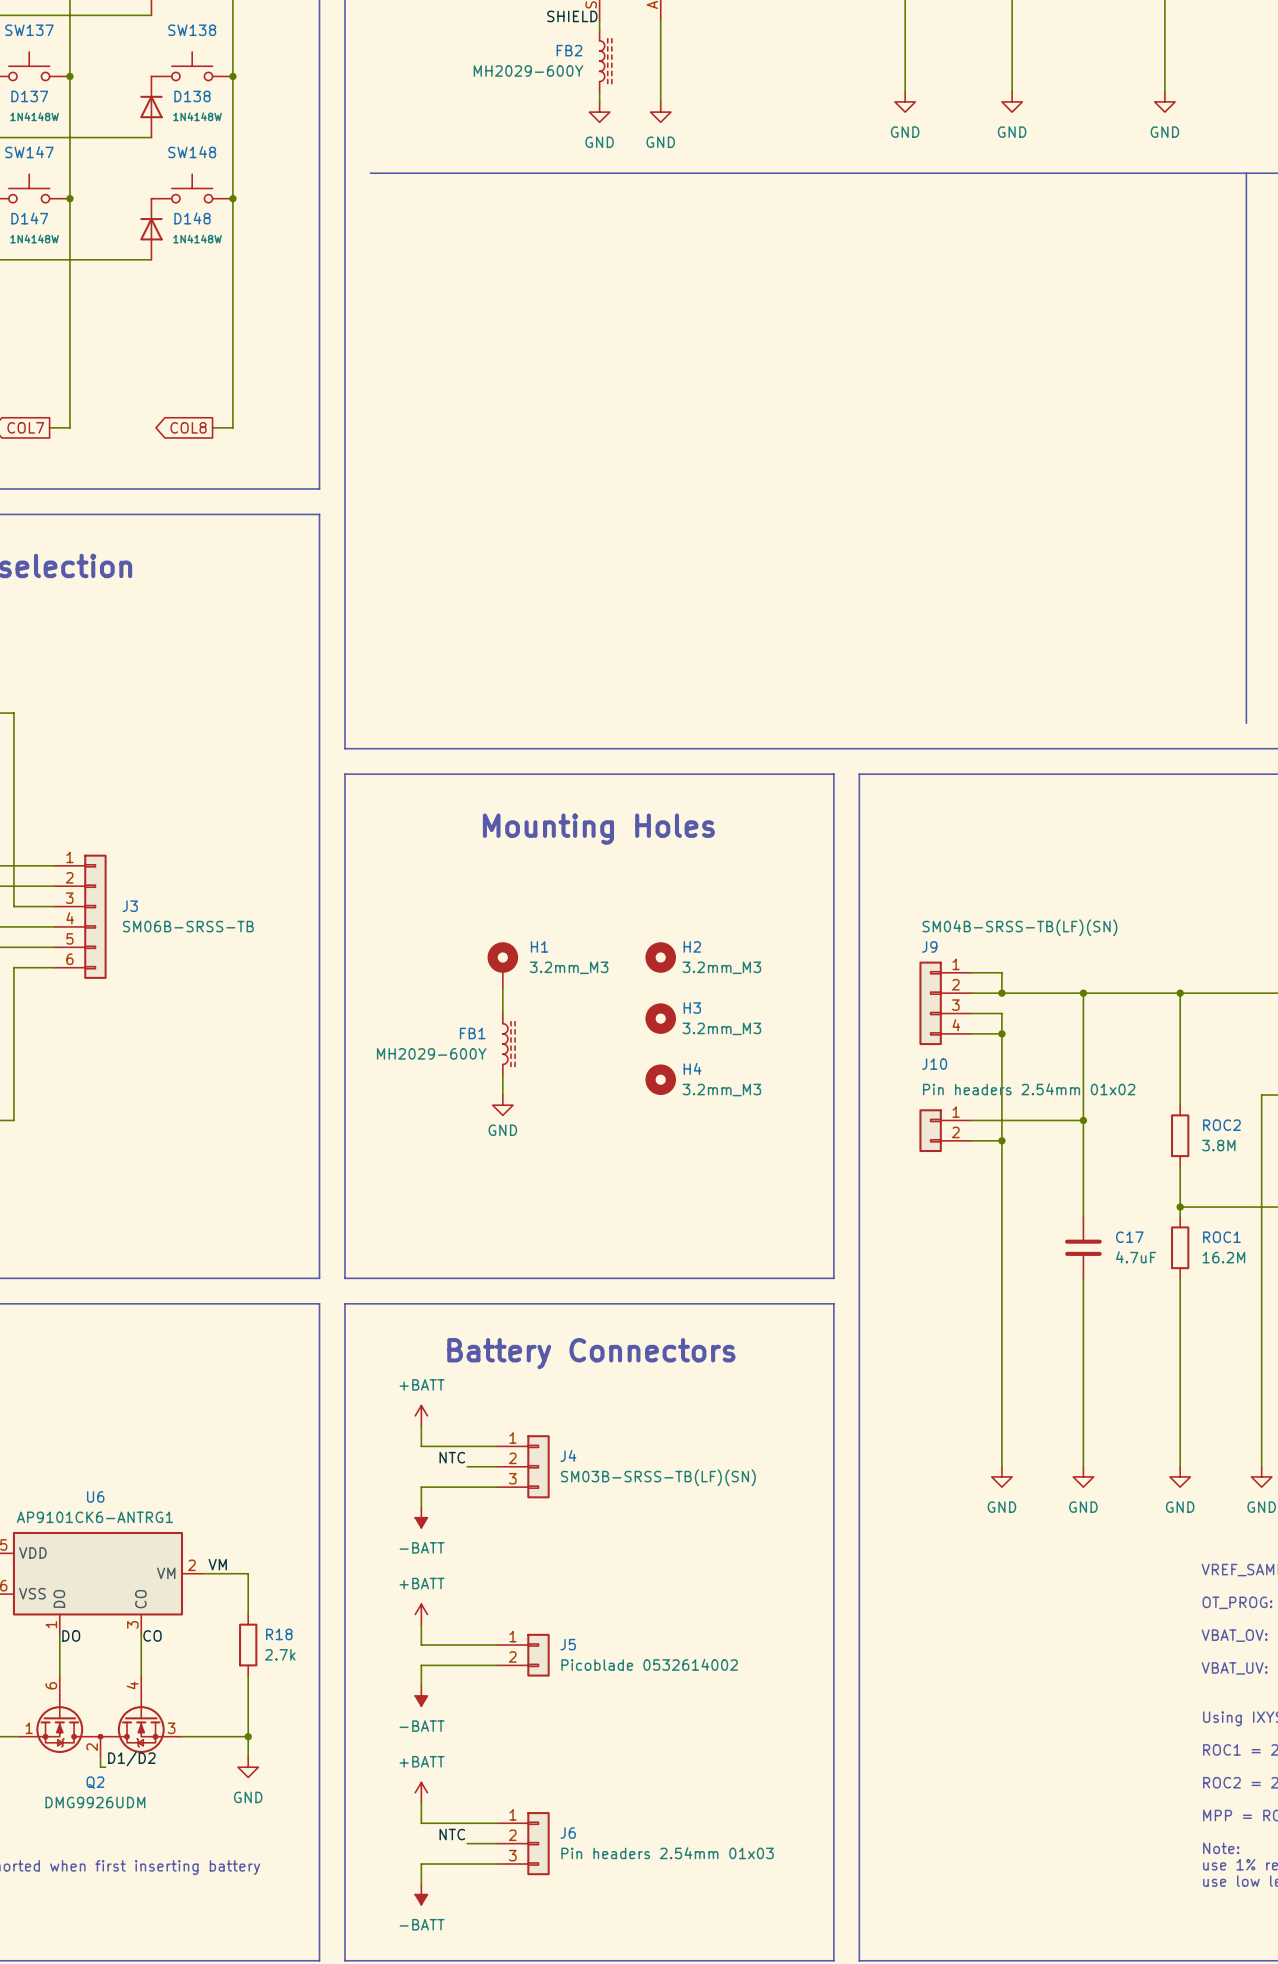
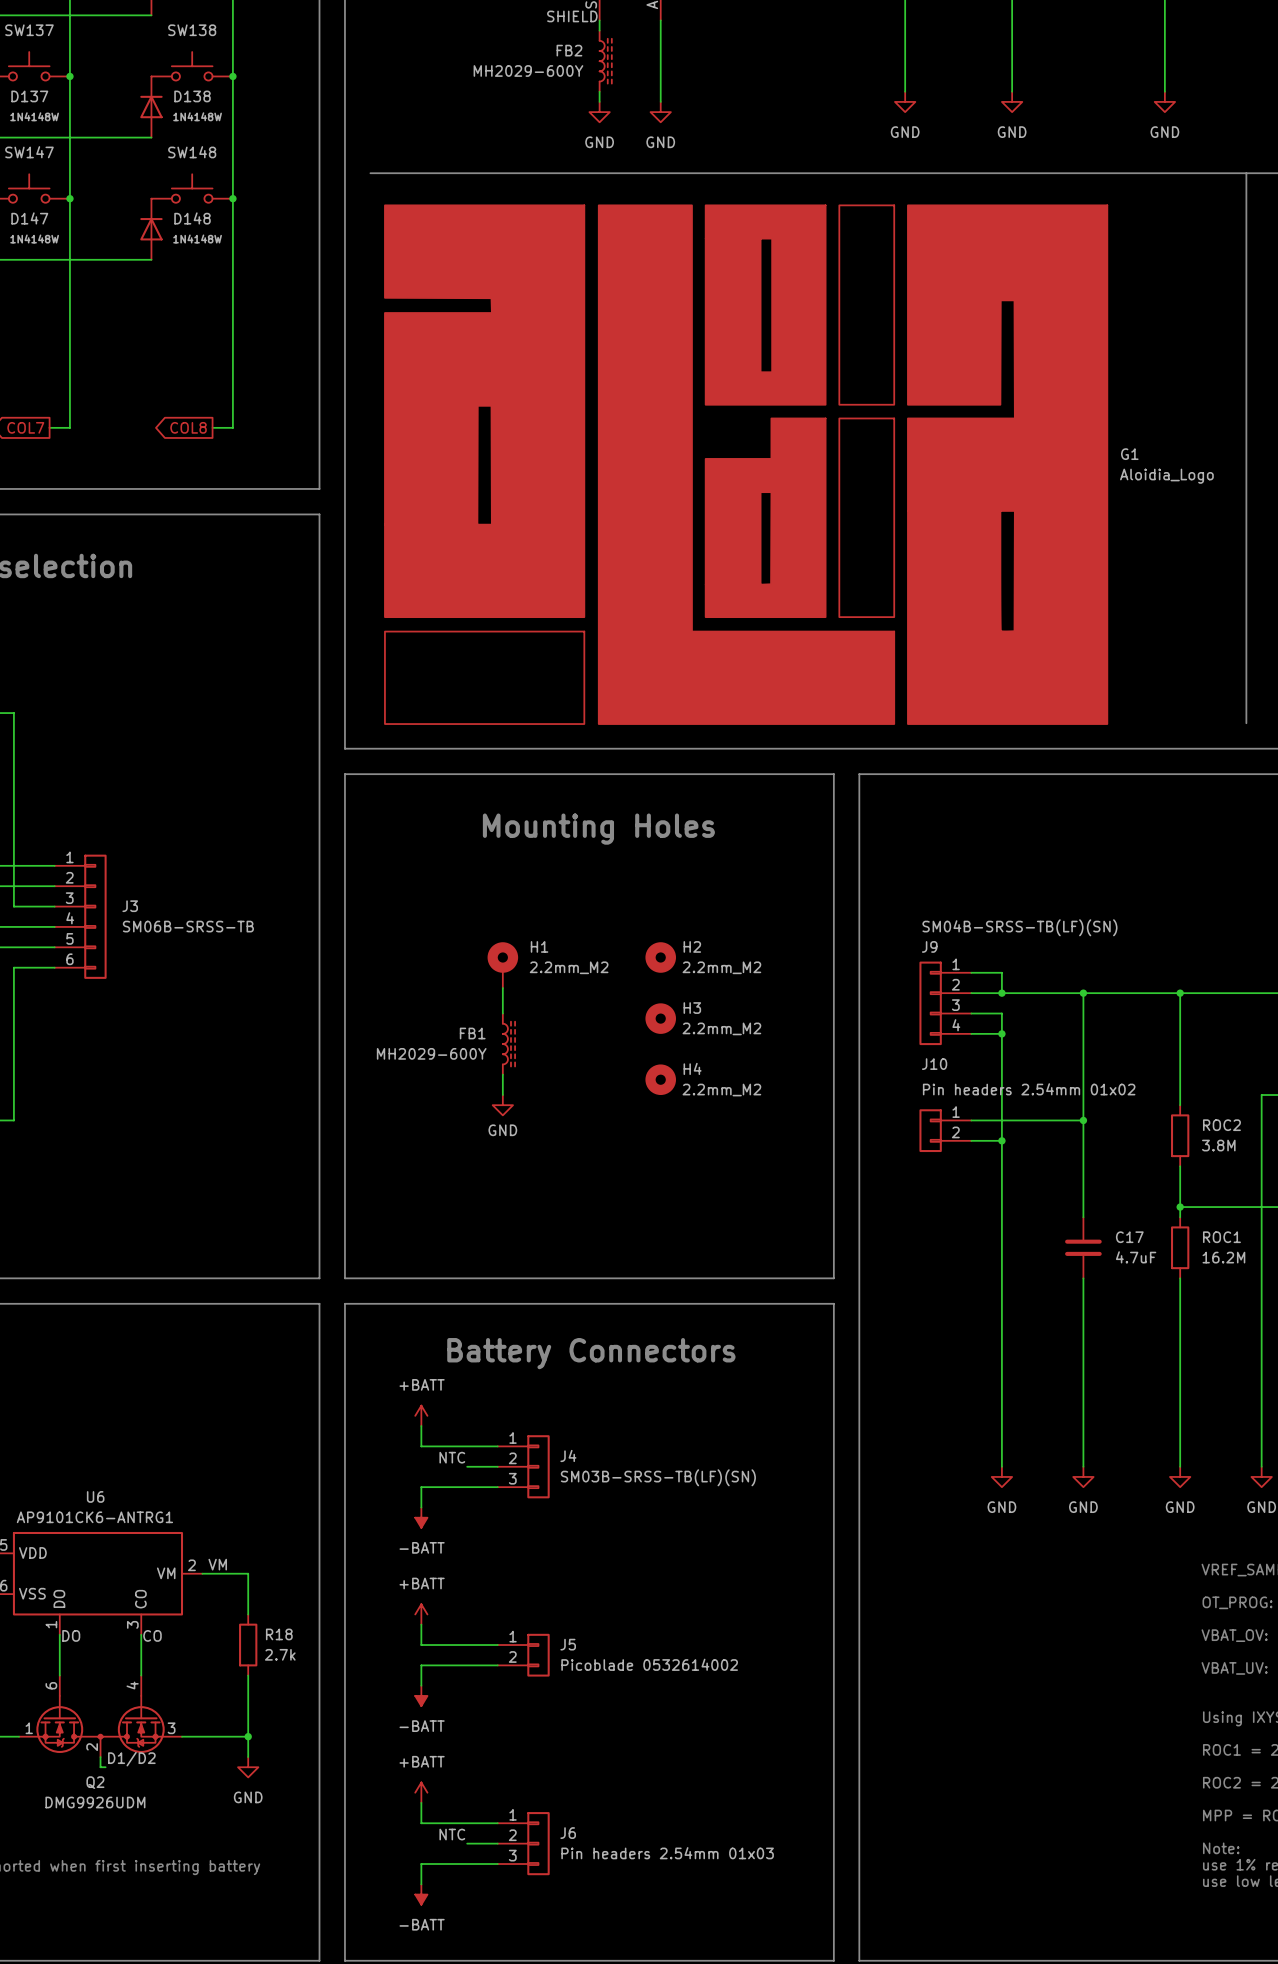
G1: none -> Aloidia_Logo (746, 464)
H1 value: 3.2mm_M3 (569, 967) -> 2.2mm_M2 (569, 967)
H2 value: 3.2mm_M3 (721, 967) -> 2.2mm_M2 (721, 967)
H3 value: 3.2mm_M3 (721, 1028) -> 2.2mm_M2 (721, 1028)
H4 value: 3.2mm_M3 (721, 1090) -> 2.2mm_M2 (721, 1090)

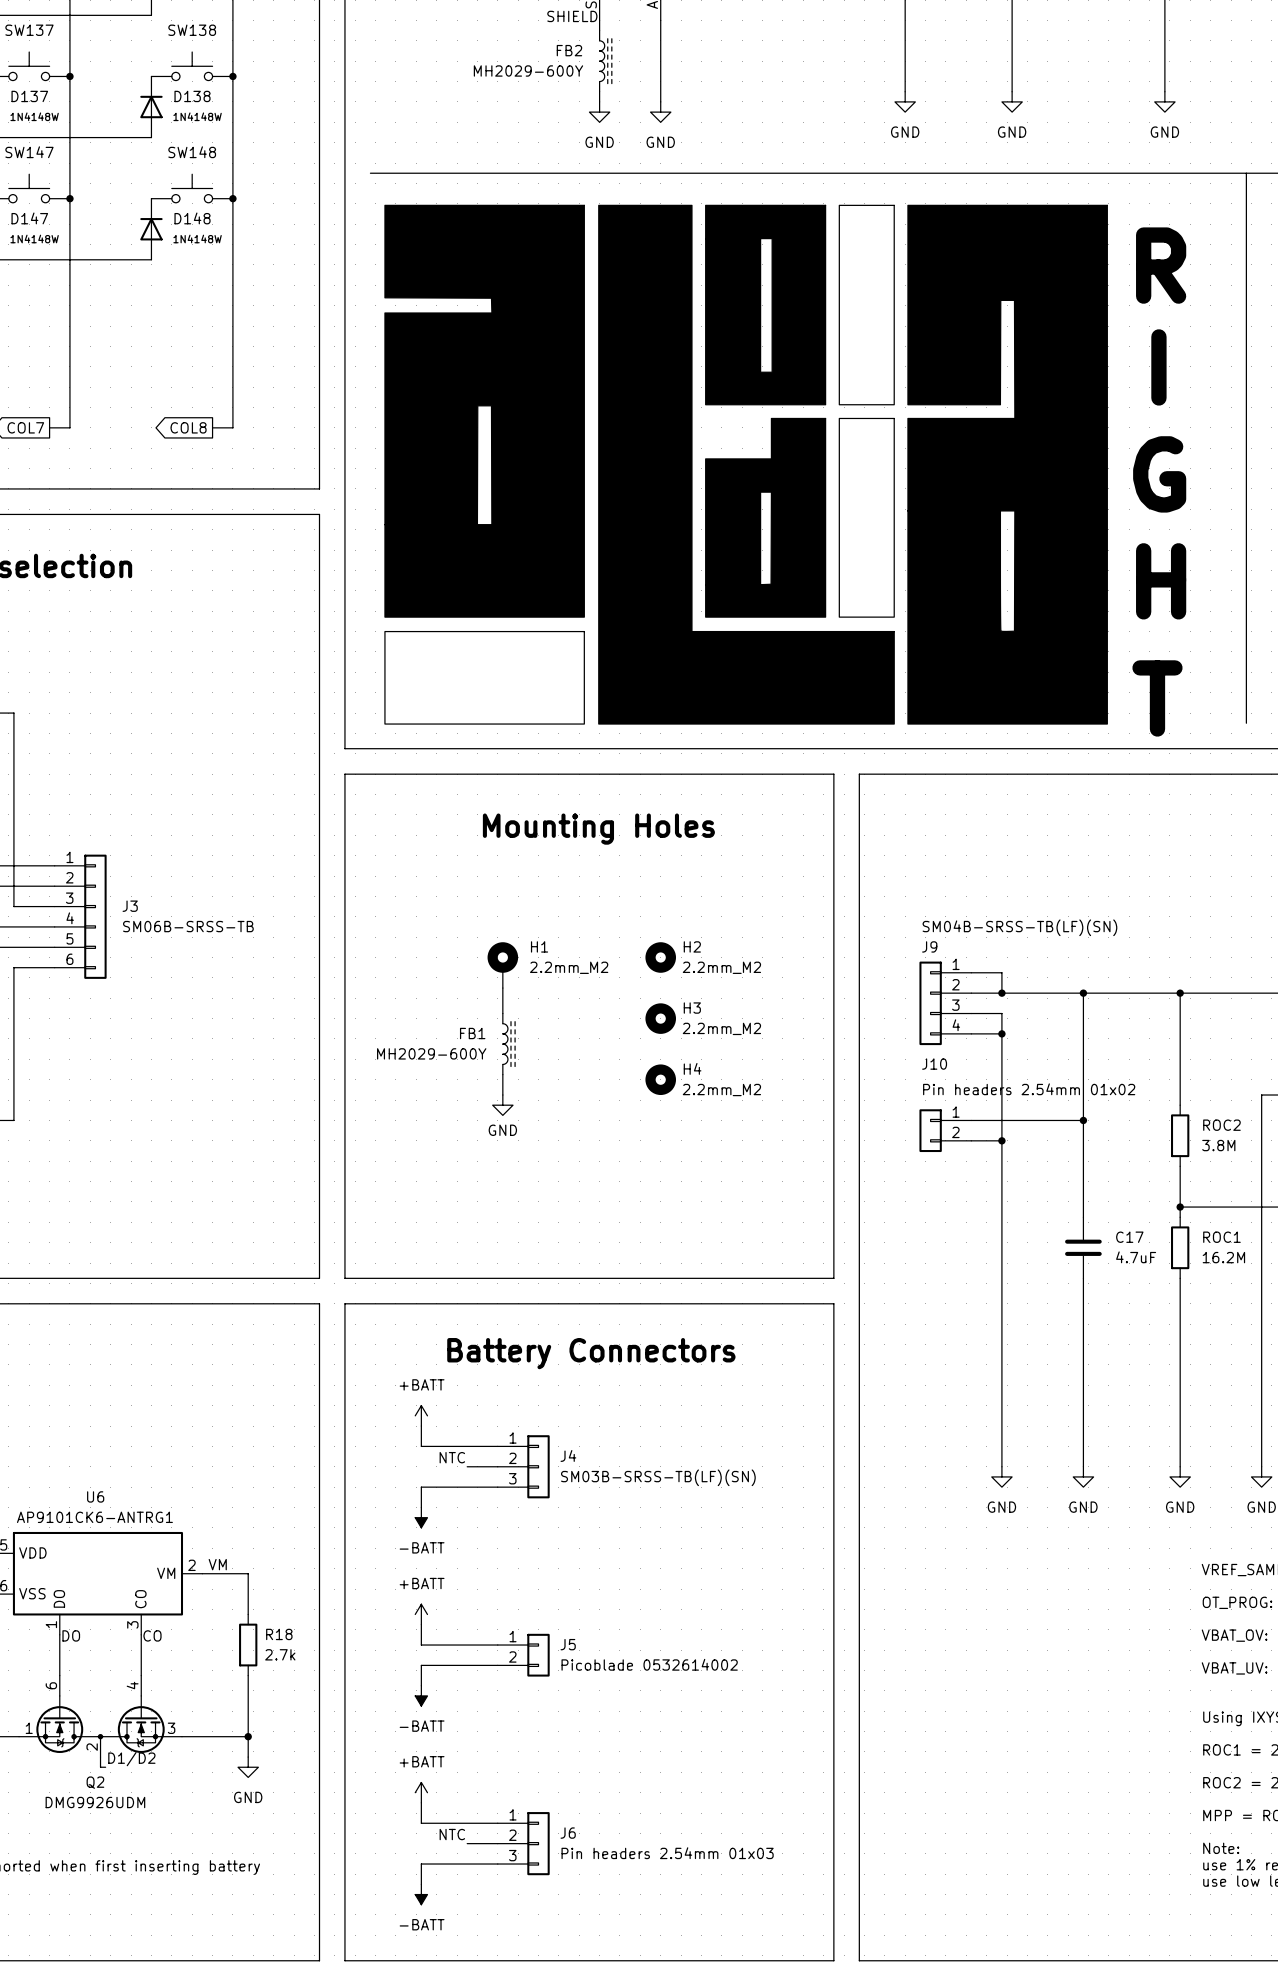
text: none -> R (1161, 265)
text: none -> I (1158, 367)
G1 name: G1 (1129, 454) -> none
text: none -> G (1159, 474)
G1 value: Aloidia_Logo (1166, 476) -> none
text: none -> H (1161, 581)
text: none -> T (1157, 698)

